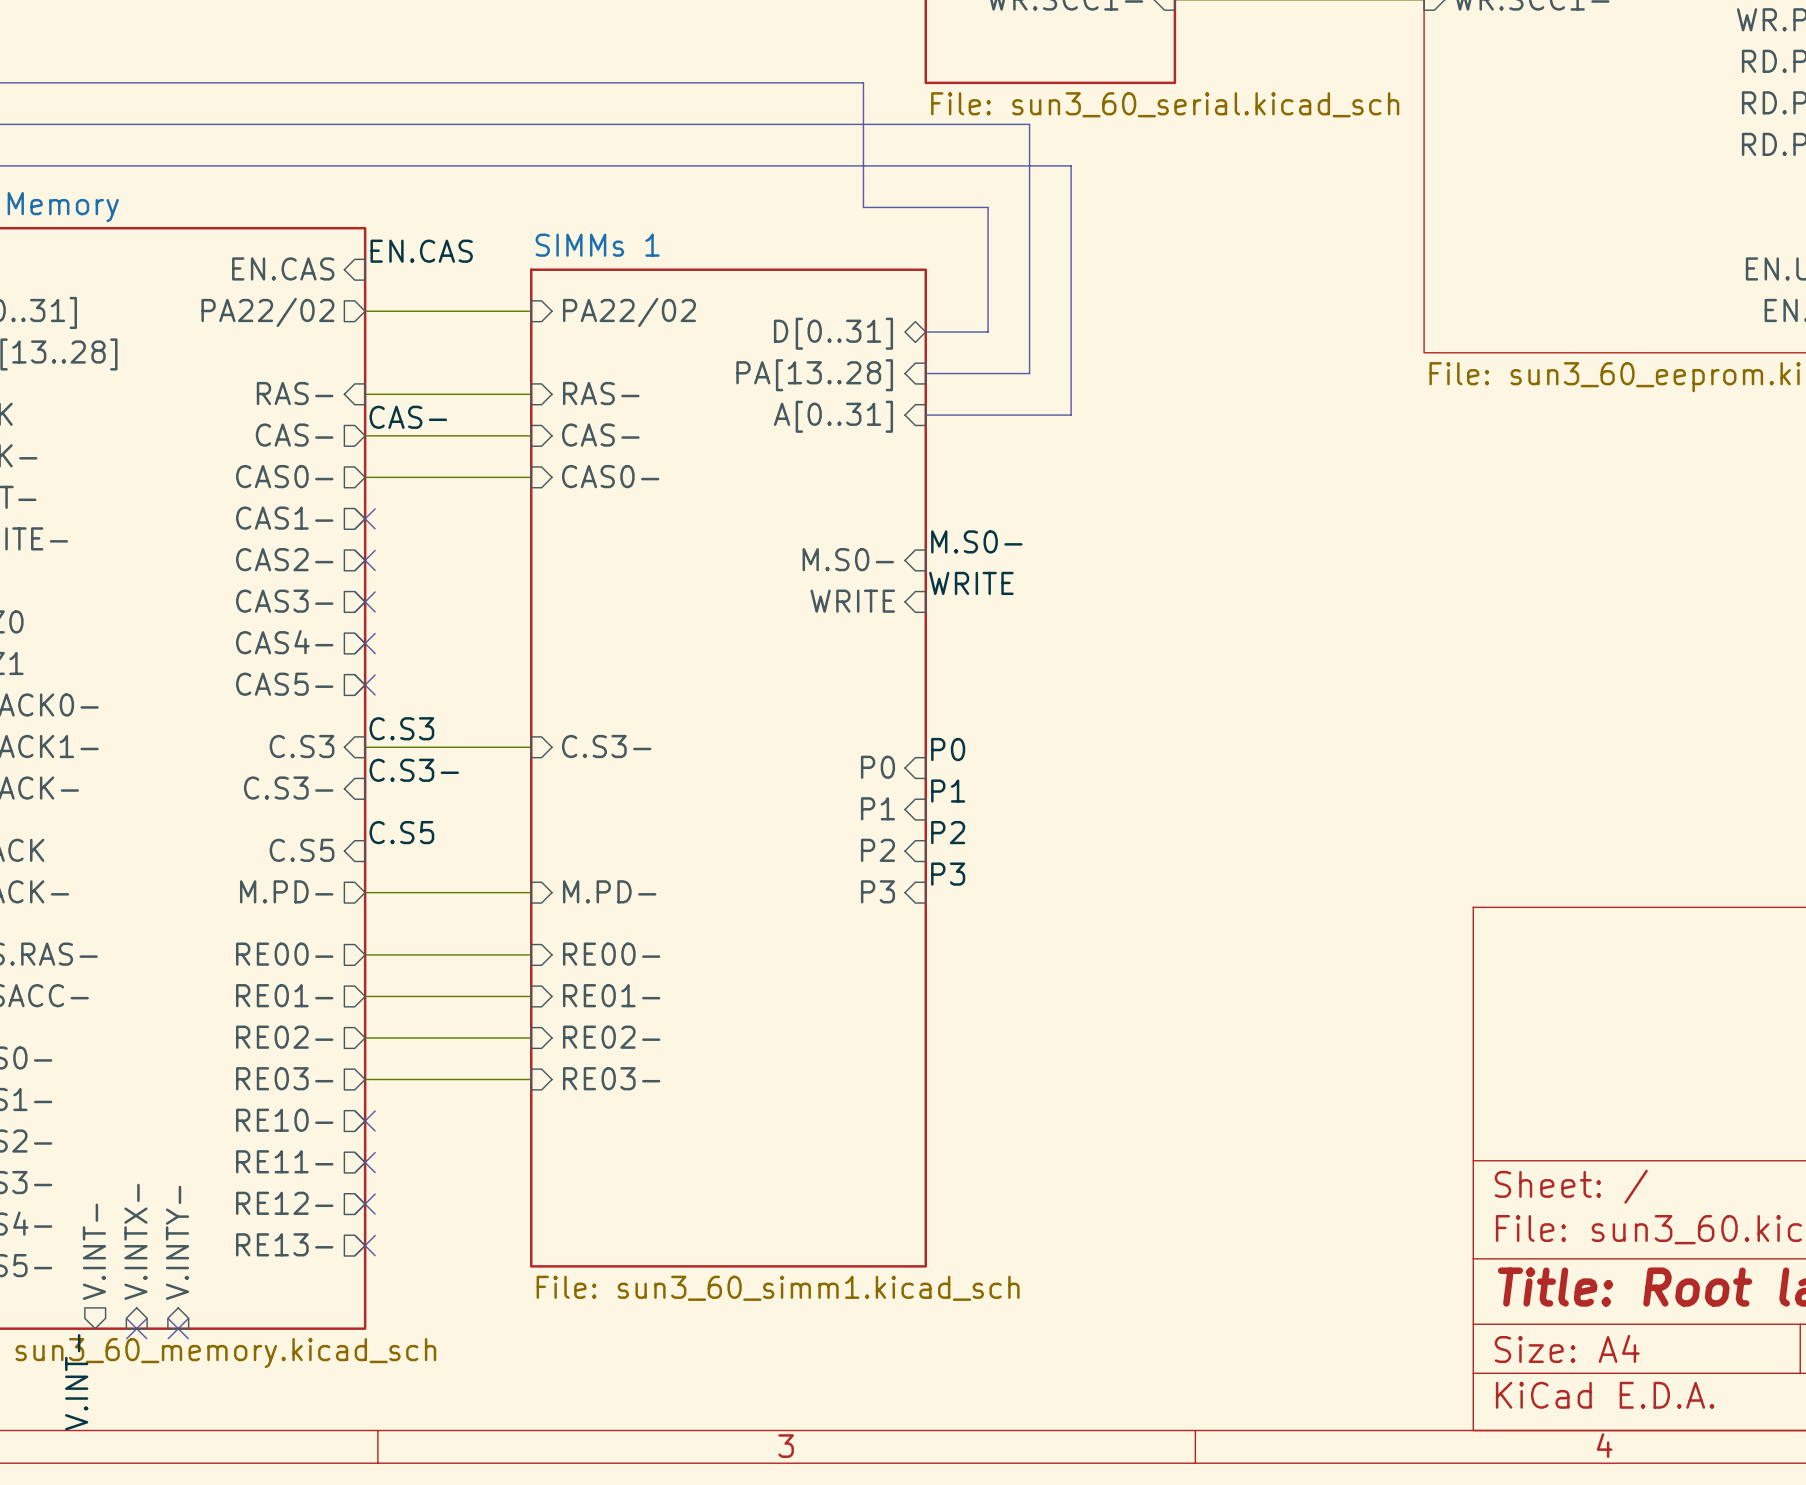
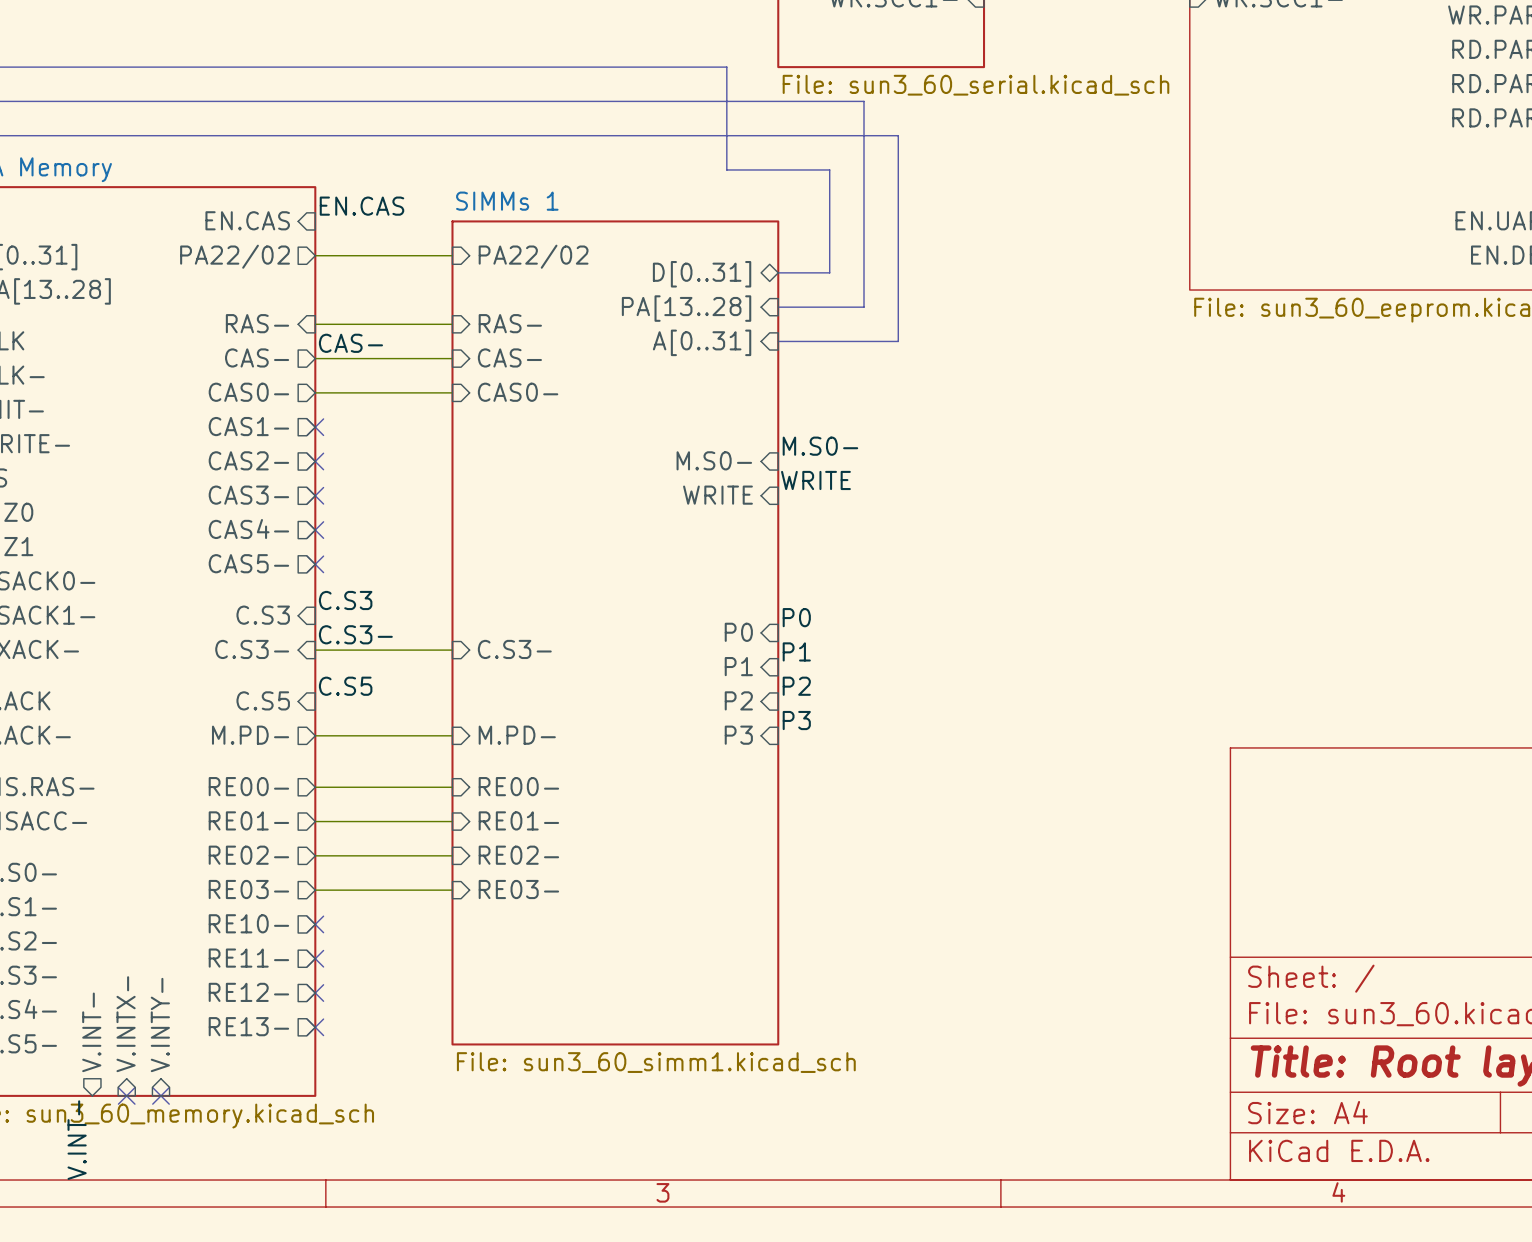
sheet pin position: C.S3- (606, 746) -> C.S3- (514, 649)
wire: (365, 747) (531, 747) -> (315, 650) (452, 650)

